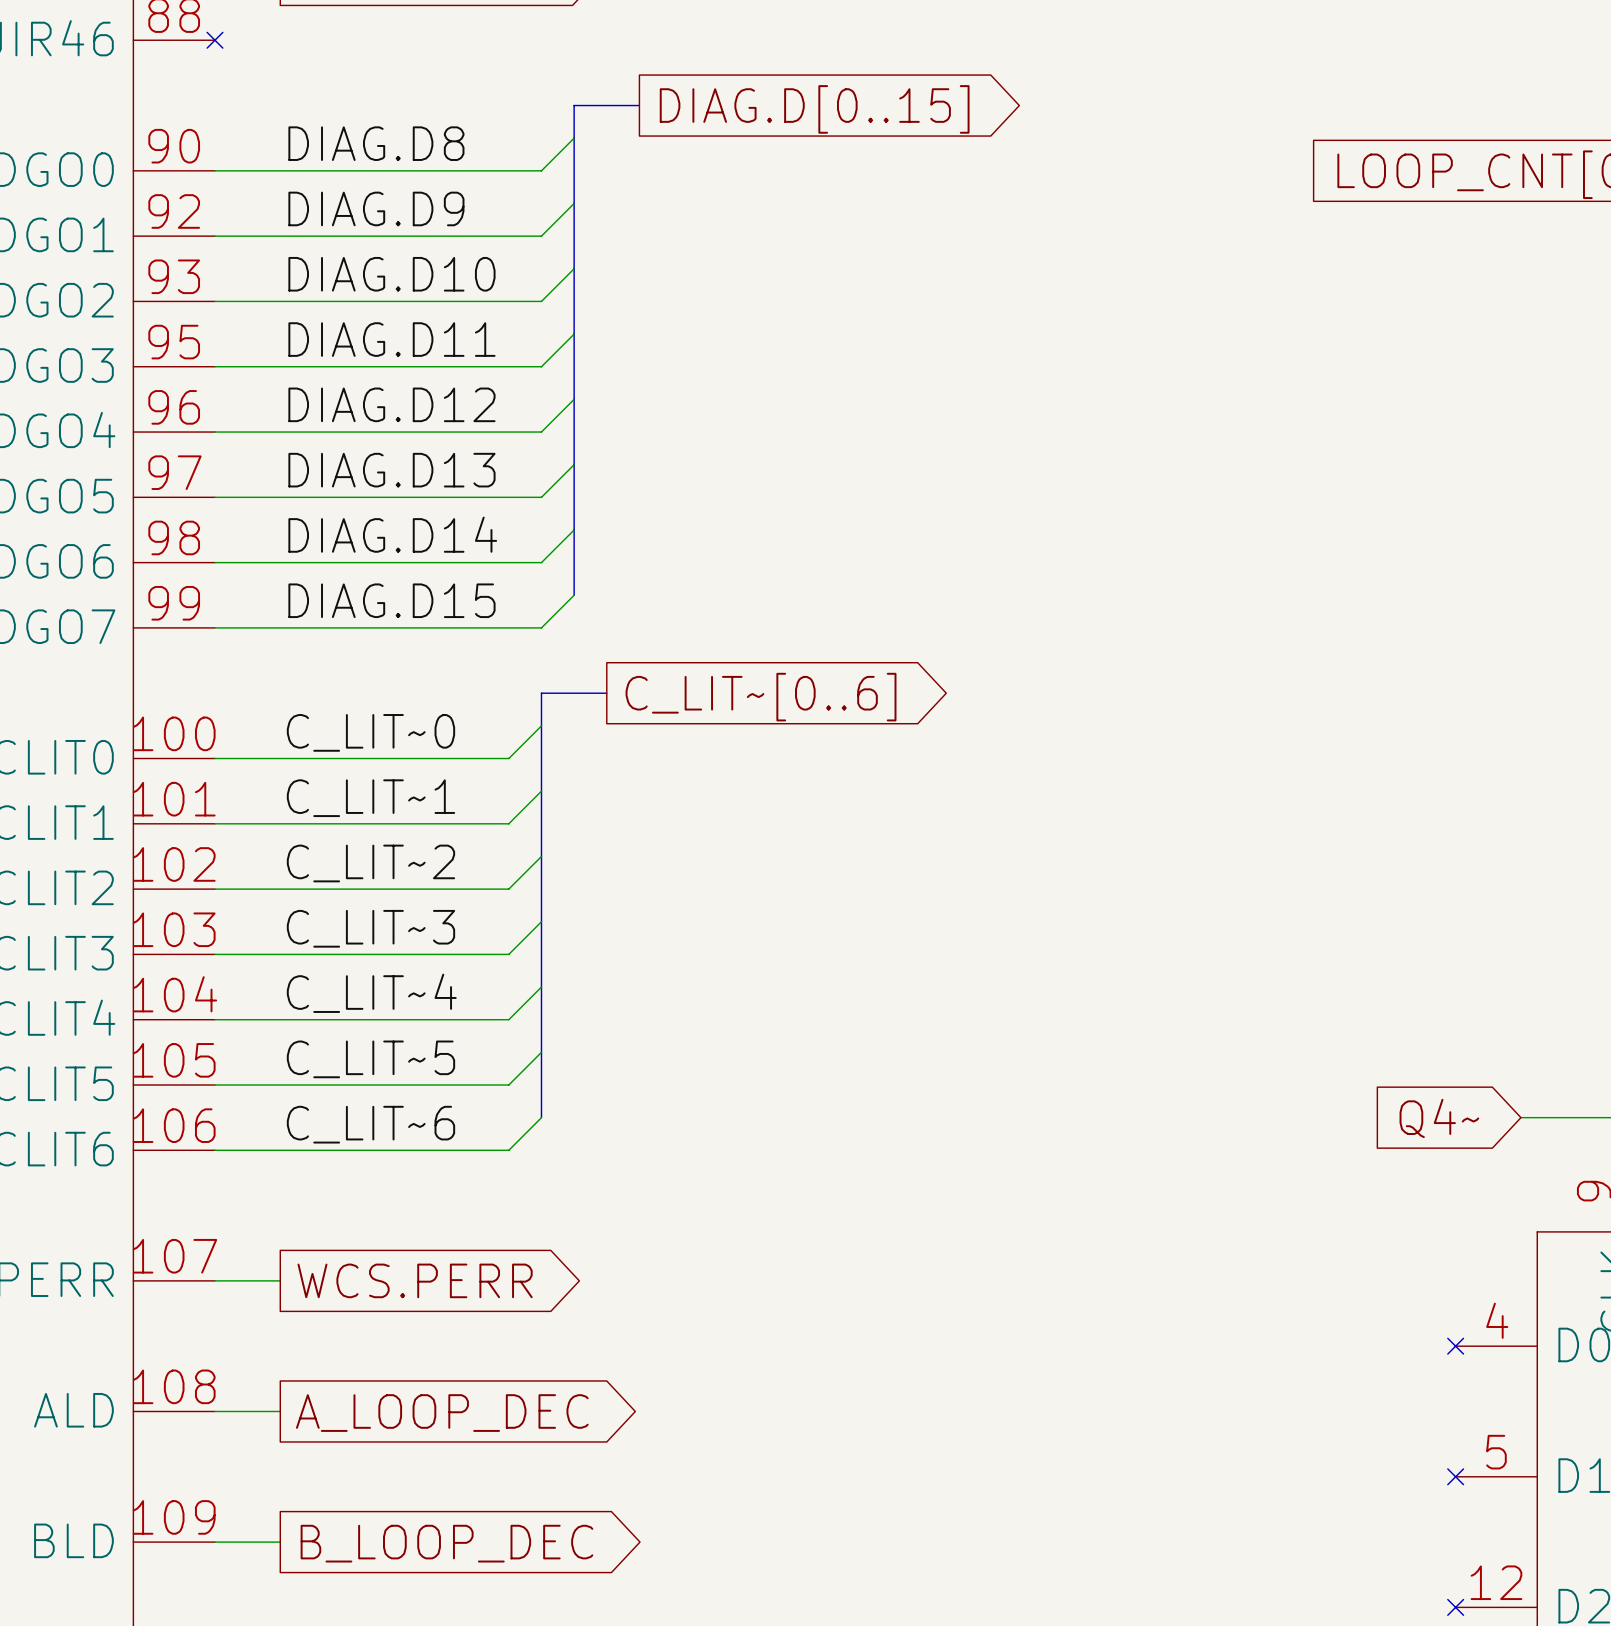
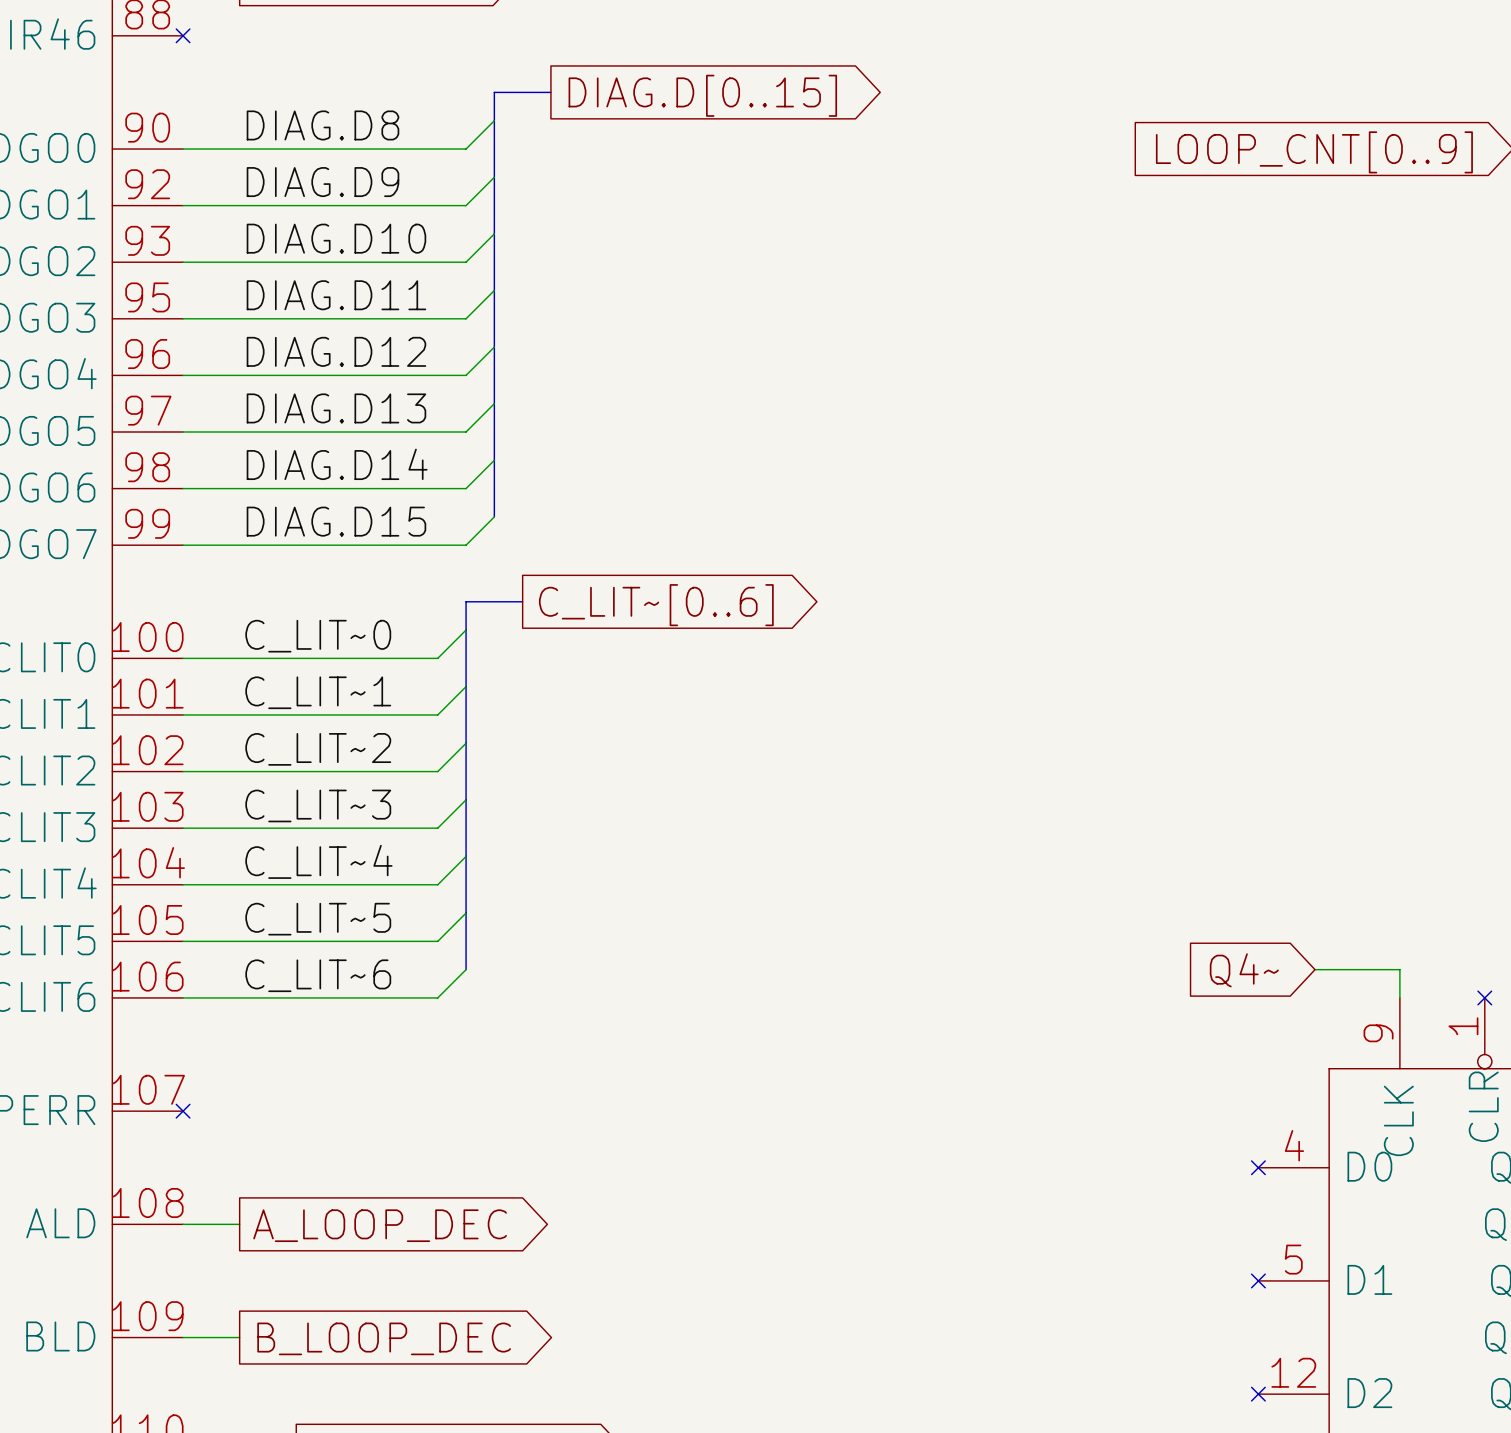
wire: (215, 1280) (280, 1280) -> none
no-connect mark: none -> (183, 1111)
global label: WCS.PERR (415, 1280) -> none

